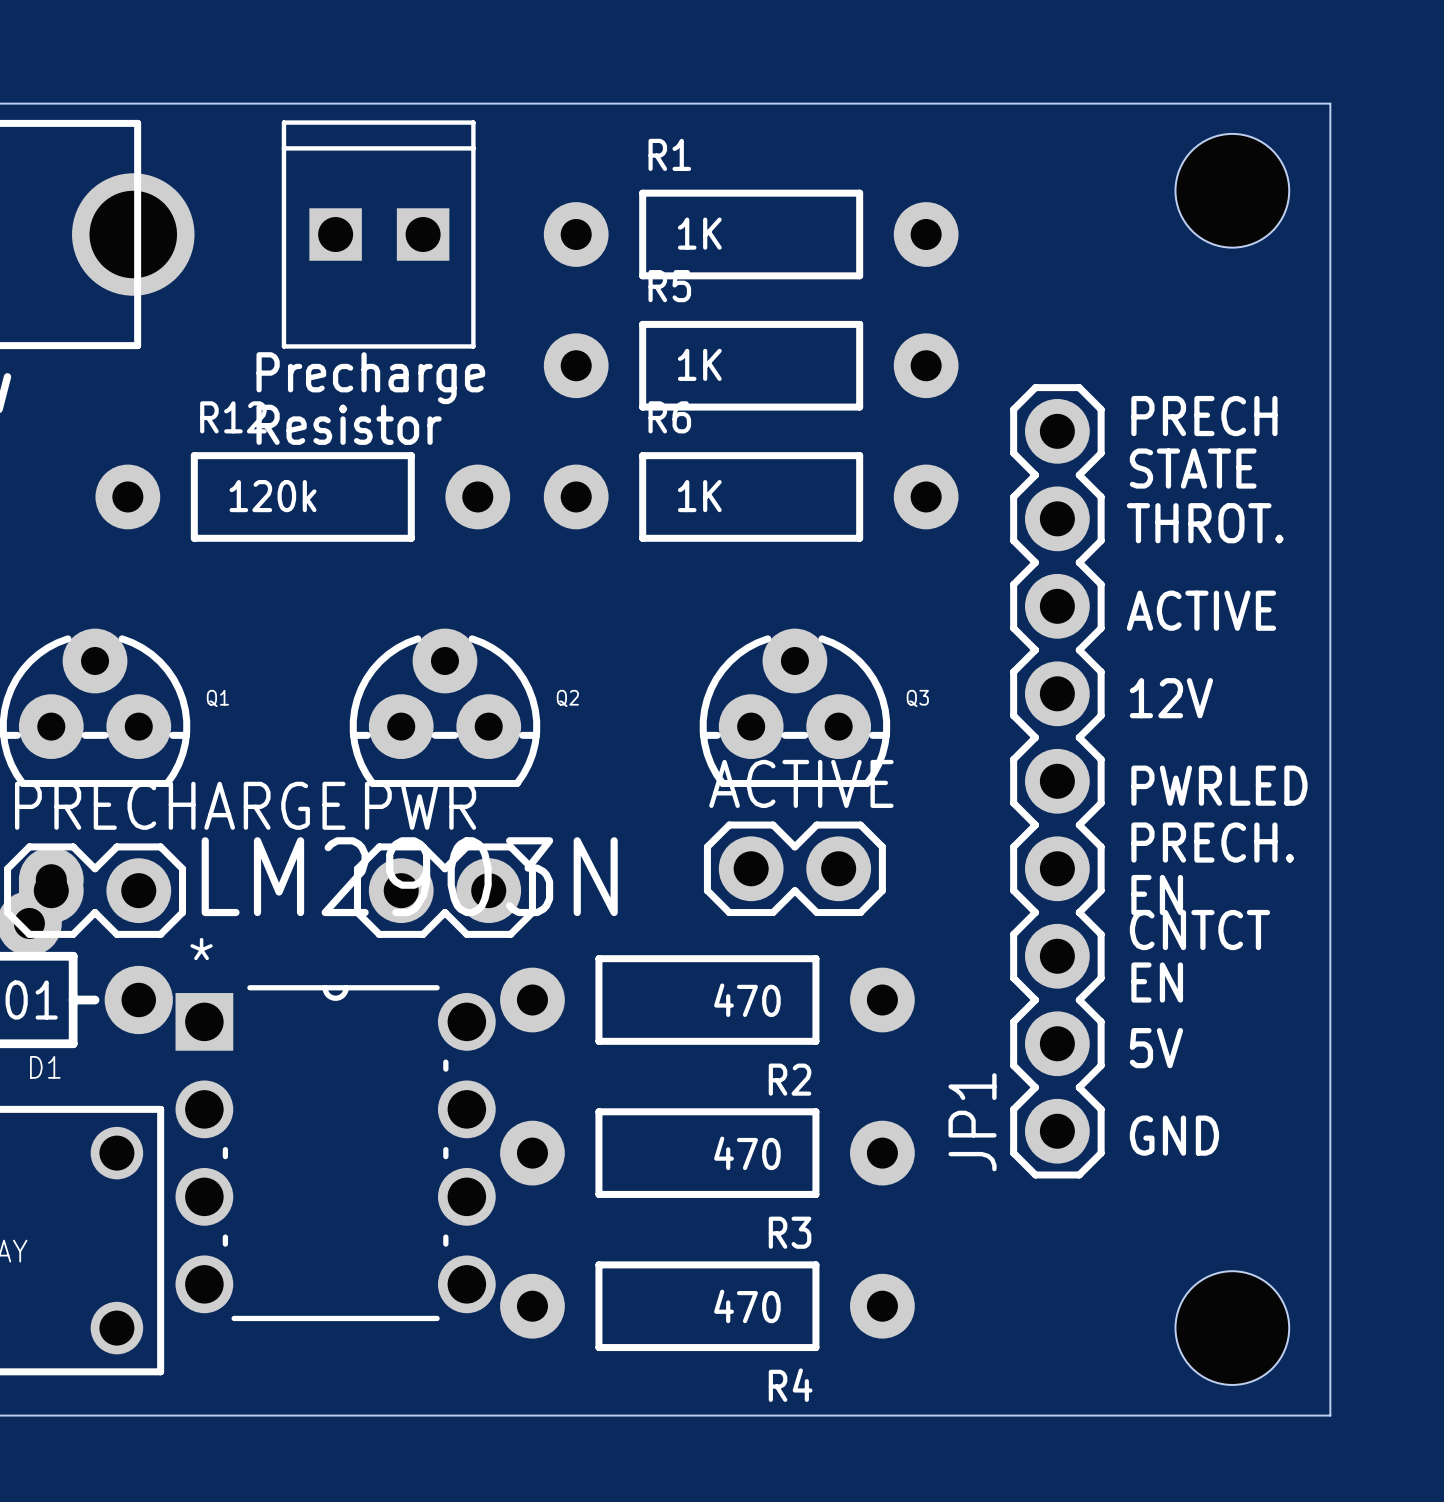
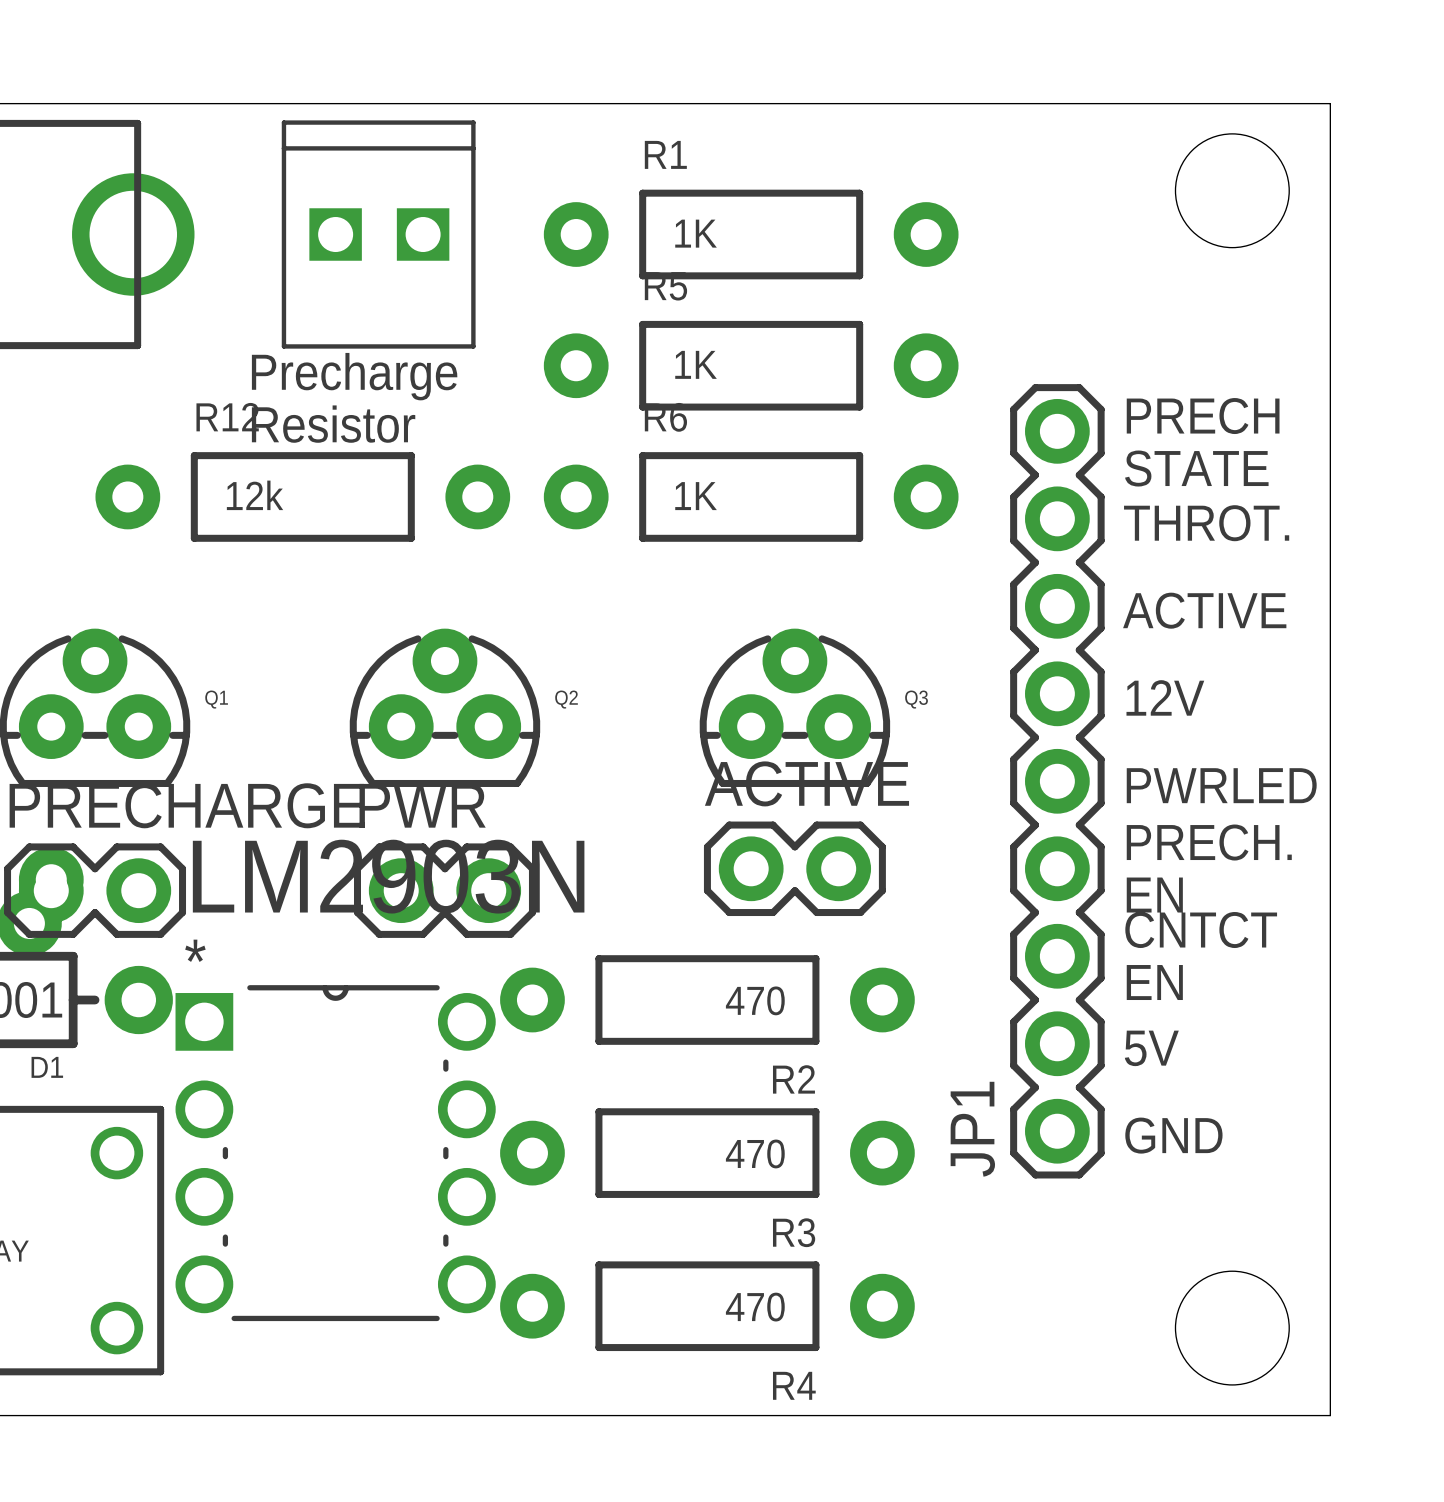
R12 value: 120k (273, 496) -> 12k (255, 495)

